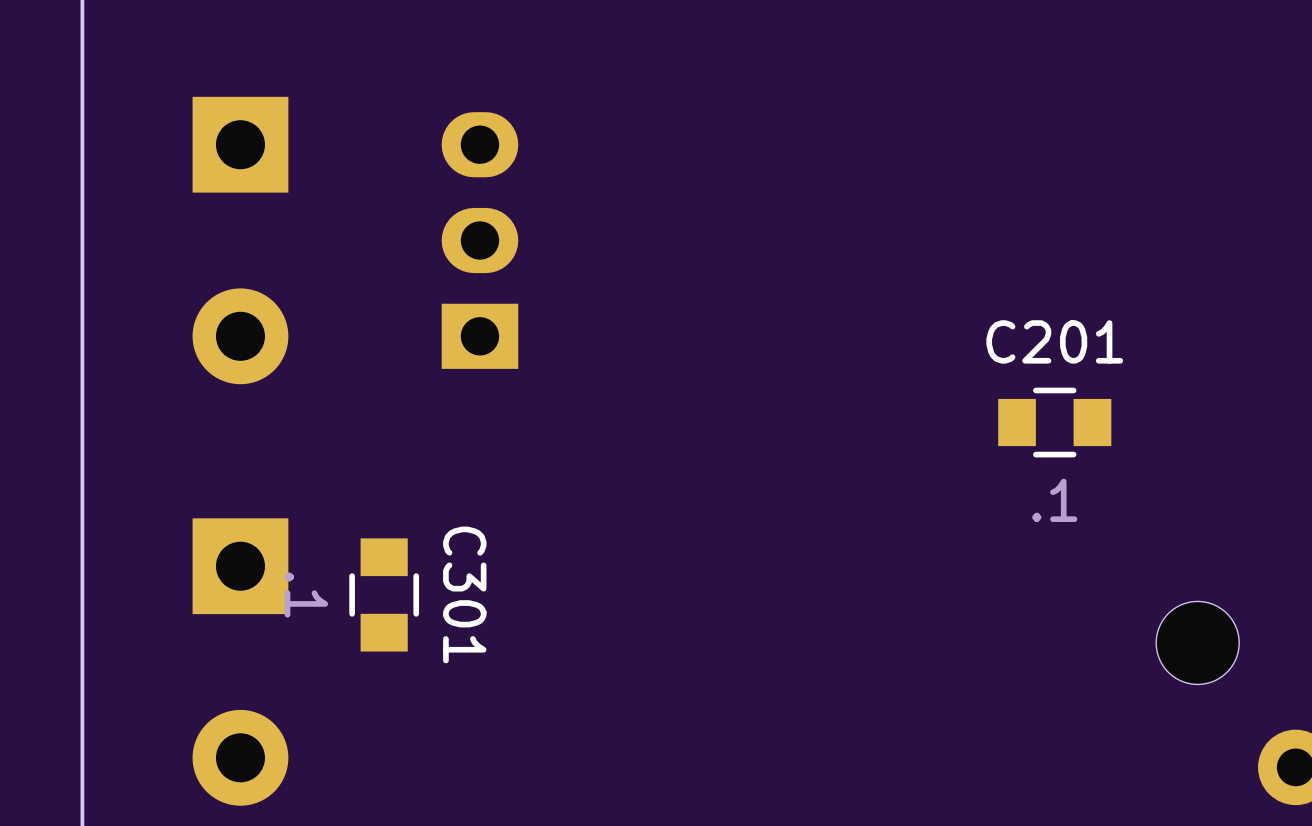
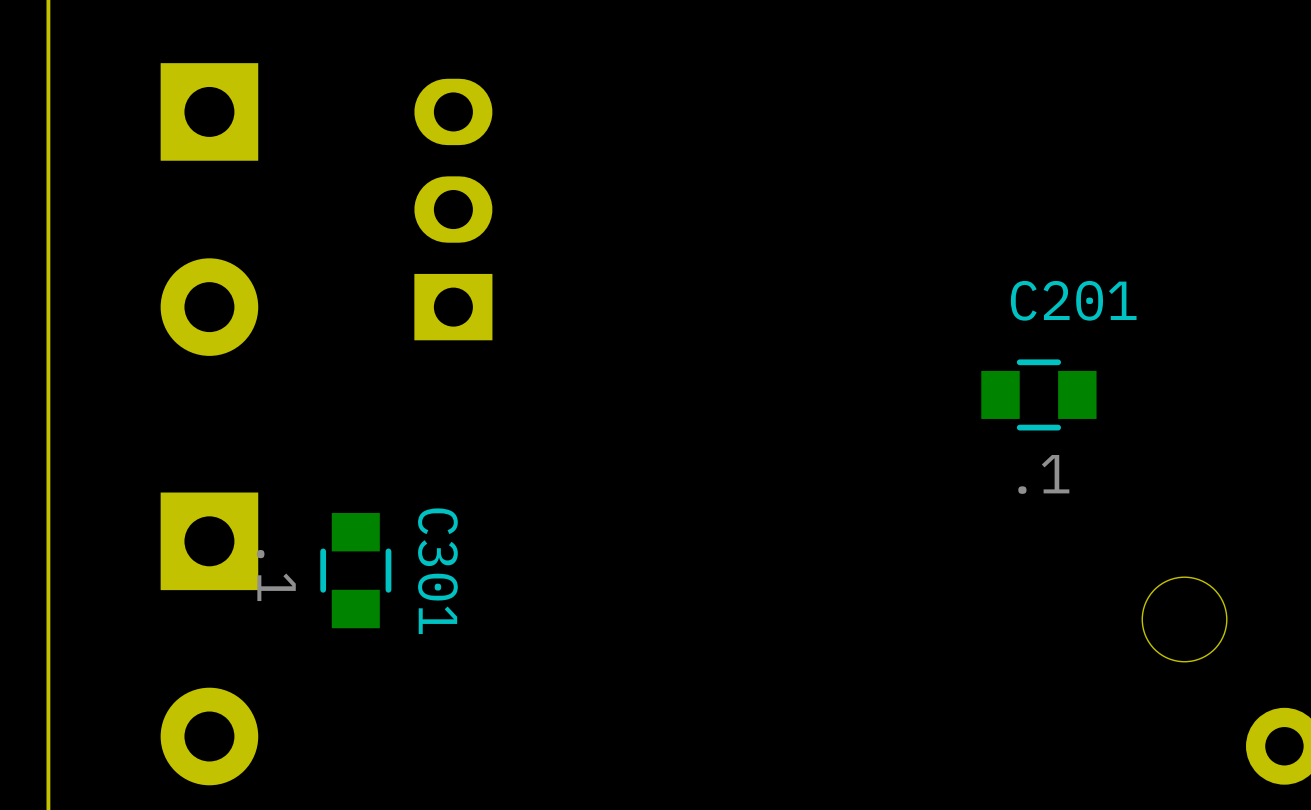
C201 name position: C201 (1054, 341) -> C201 (1073, 300)

